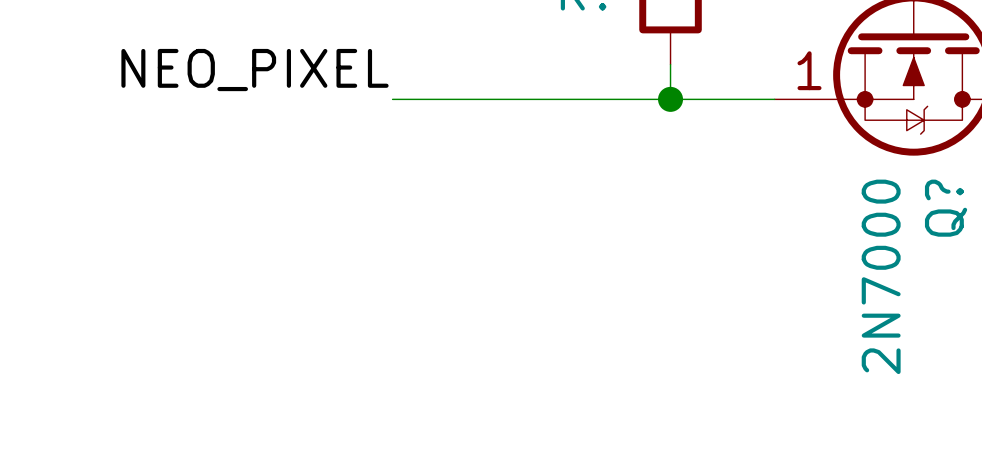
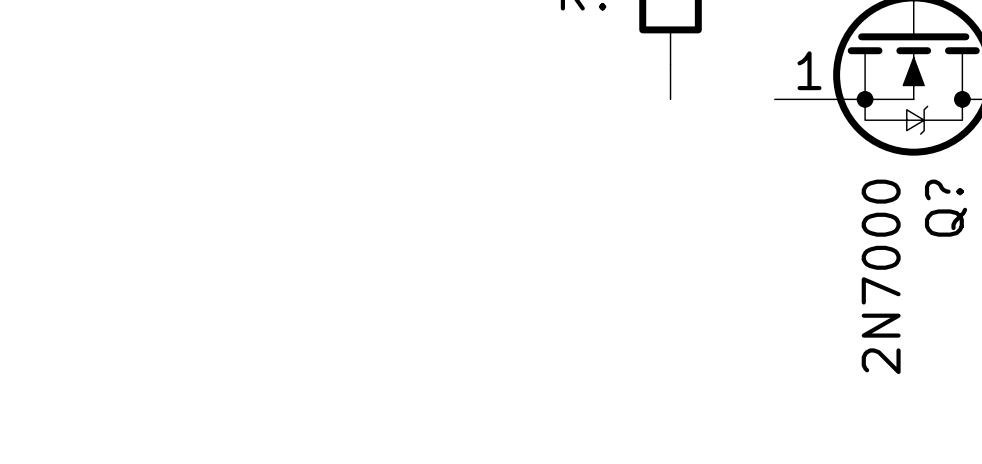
label: NEO_PIXEL (255, 70) -> none
wire: (392, 99) (774, 99) -> none
junction: (670, 99) -> none

